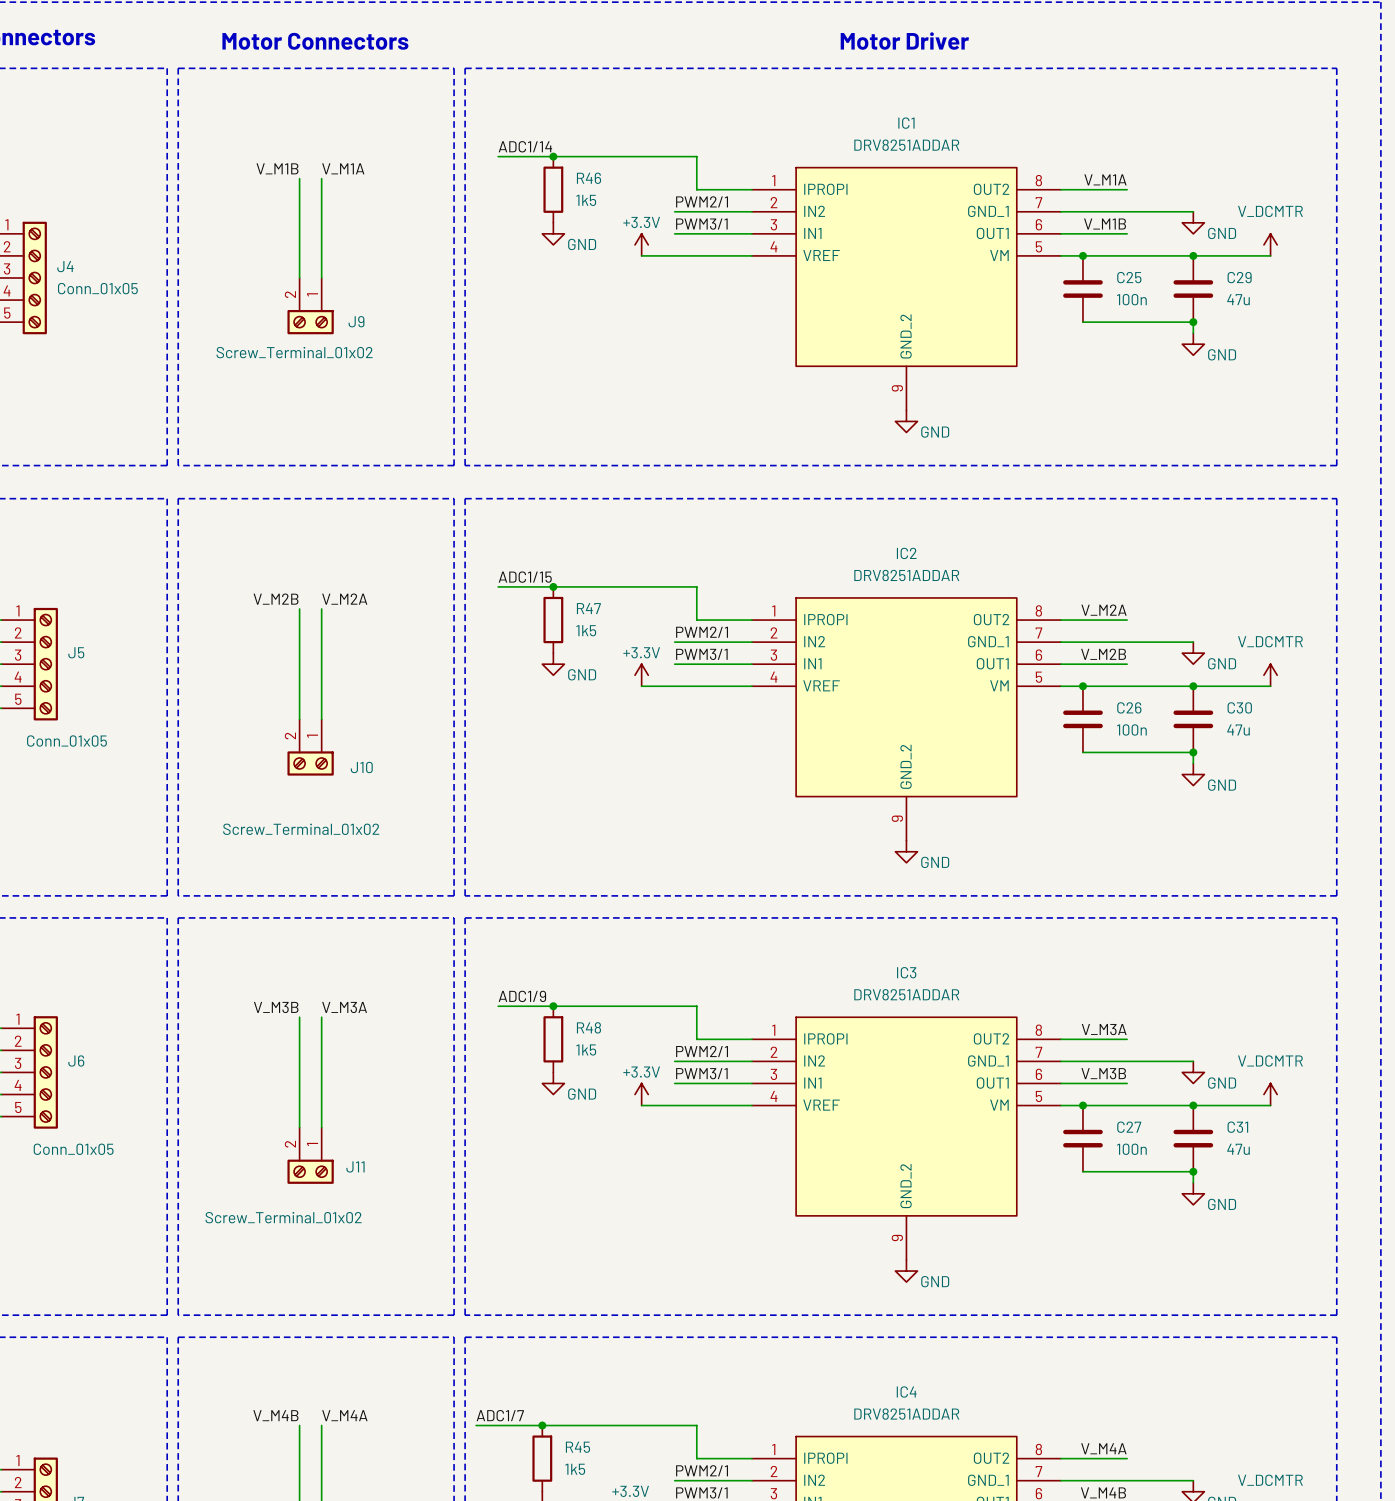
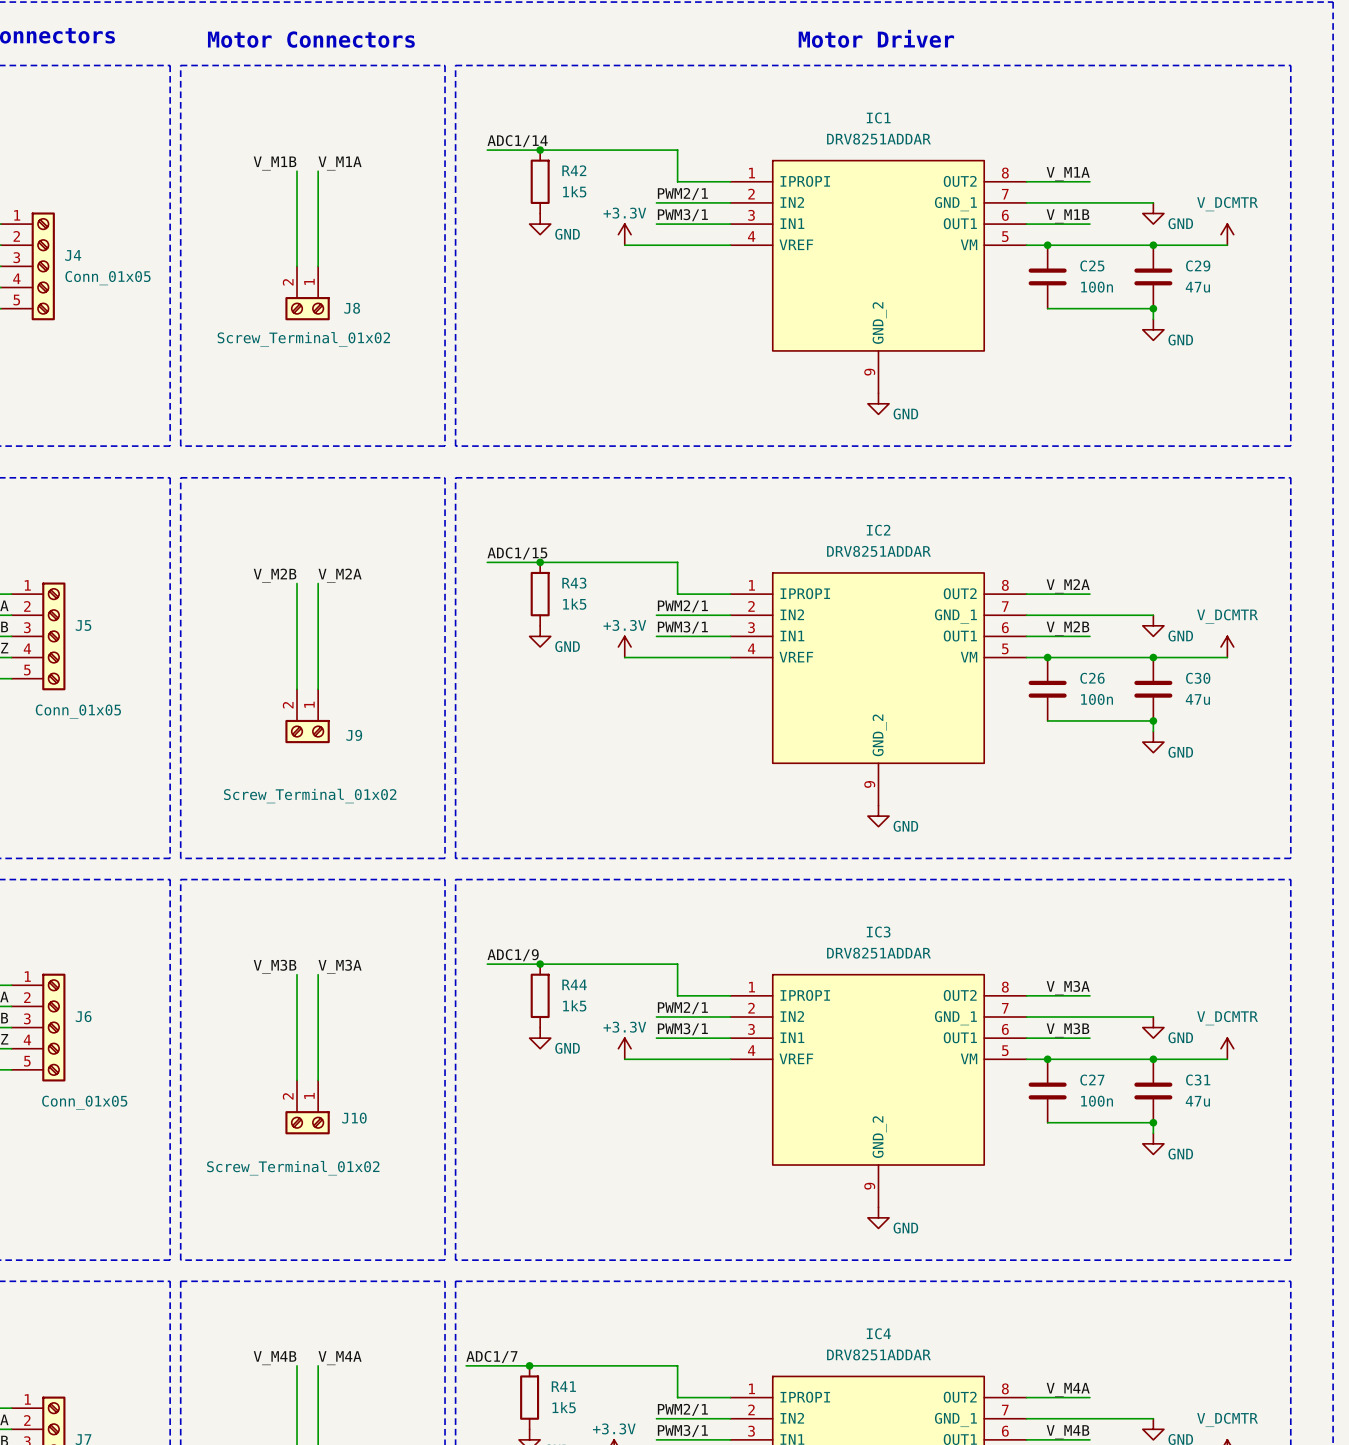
R46 name: R46 (589, 178) -> R42 (574, 170)
J9 name: J9 (356, 321) -> J8 (352, 308)
R47 name: R47 (588, 608) -> R43 (574, 583)
J10 name: J10 (361, 767) -> J9 (354, 735)
R48 name: R48 (588, 1027) -> R44 (574, 984)
J11 name: J11 (355, 1166) -> J10 (354, 1118)
R45 name: R45 (577, 1447) -> R41 (563, 1386)

